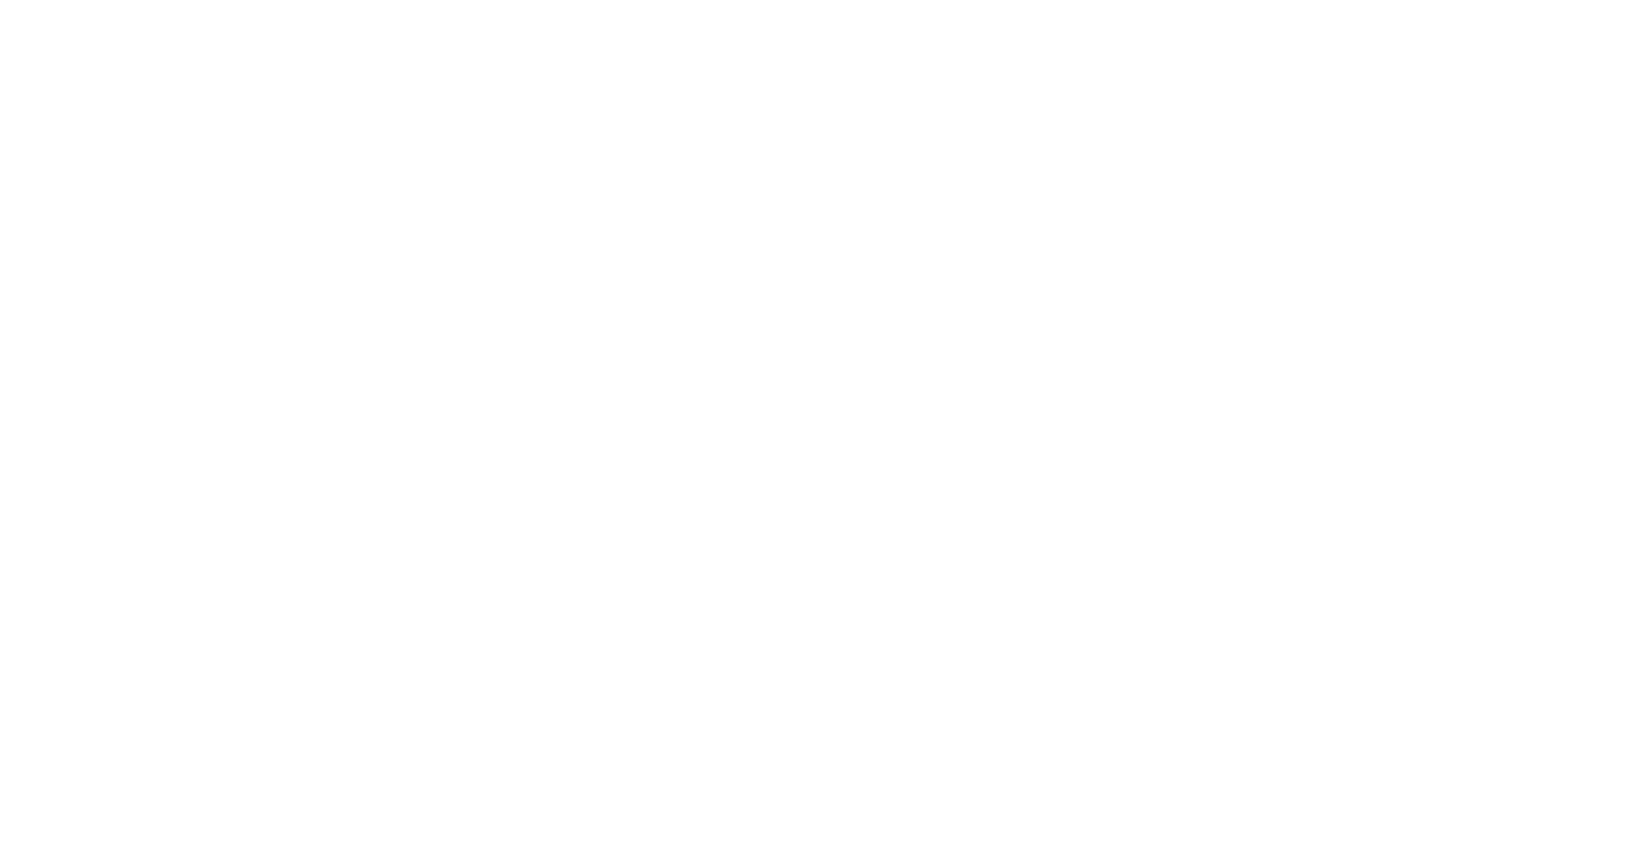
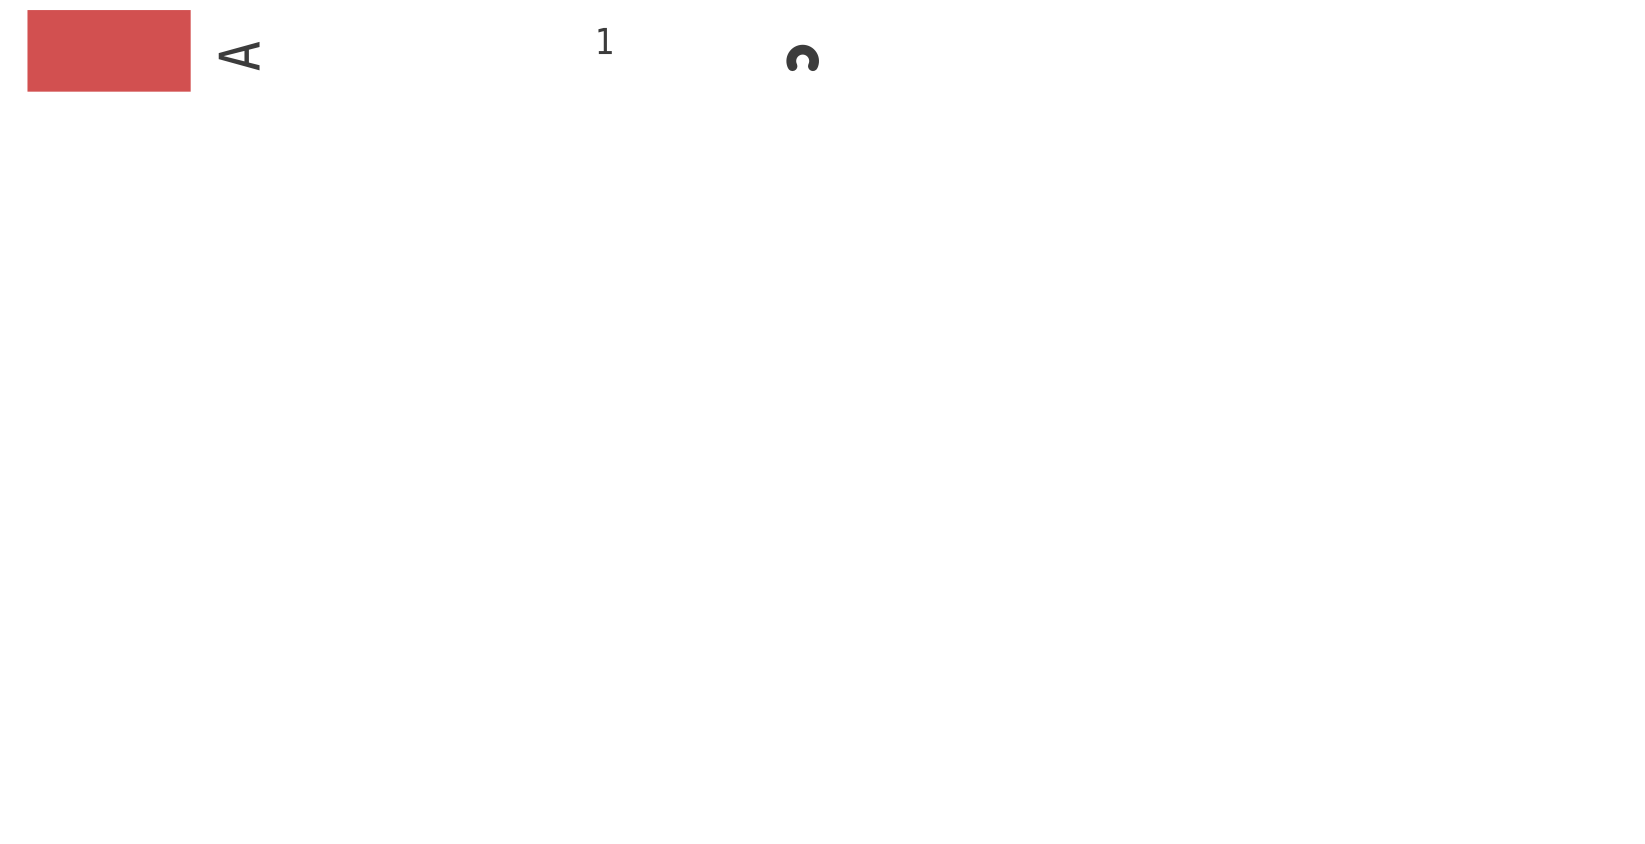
text: none -> 1 (605, 40)
part: none -> (109, 50)
text: none -> A (239, 56)
line: none -> (792, 66) (792, 55) (802, 49) (812, 55) (812, 66)

